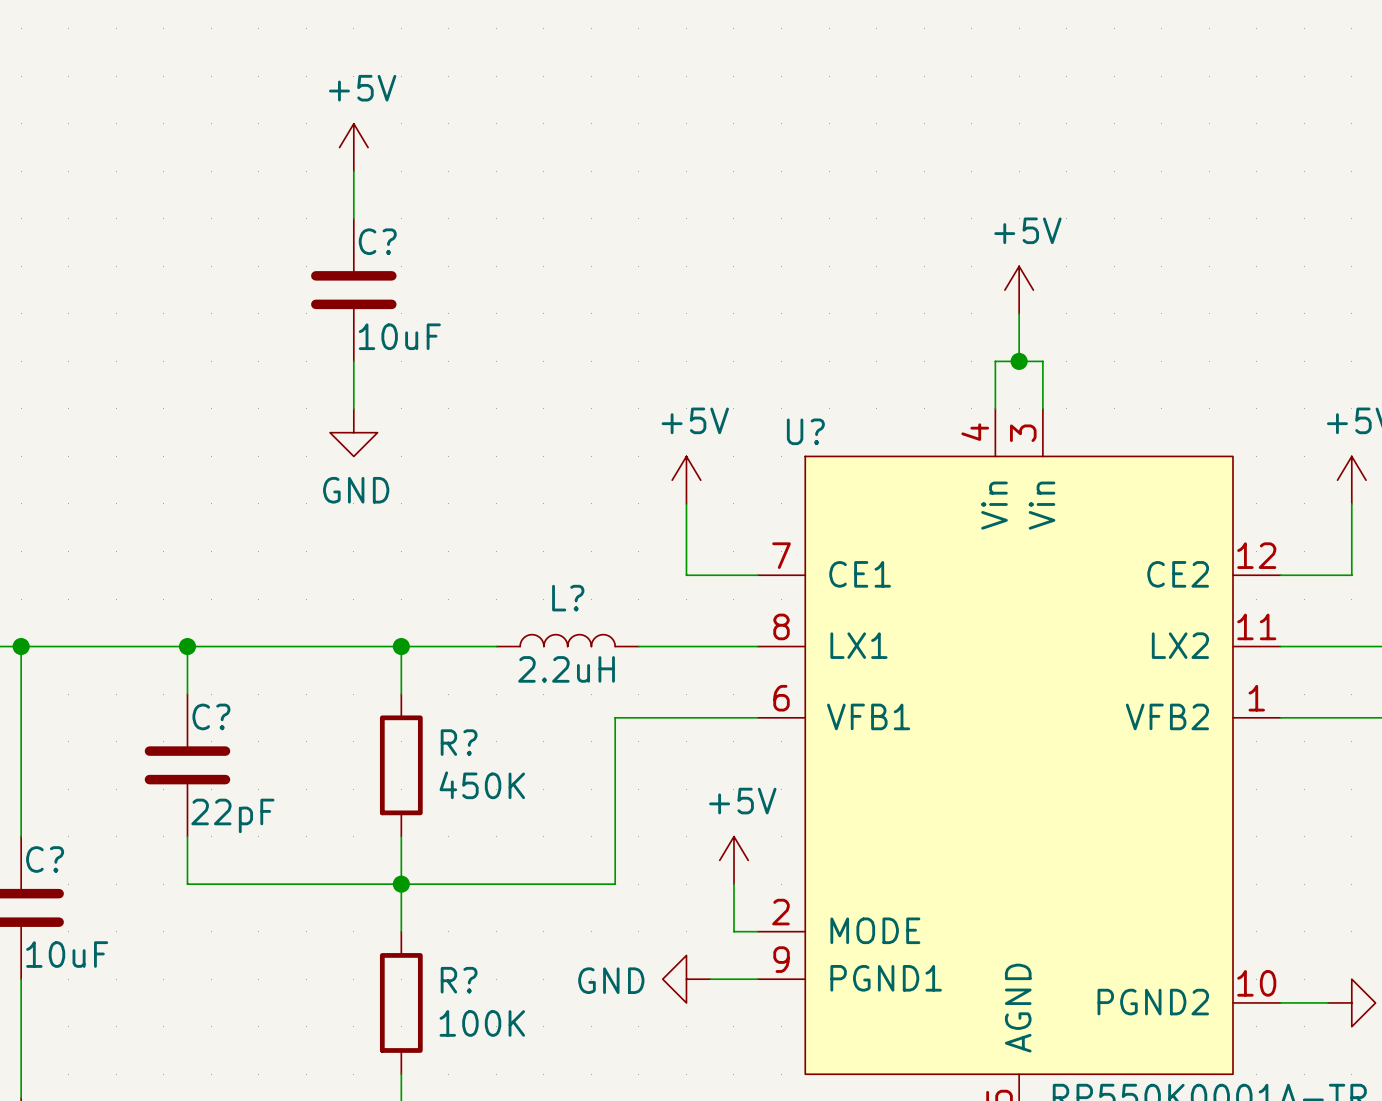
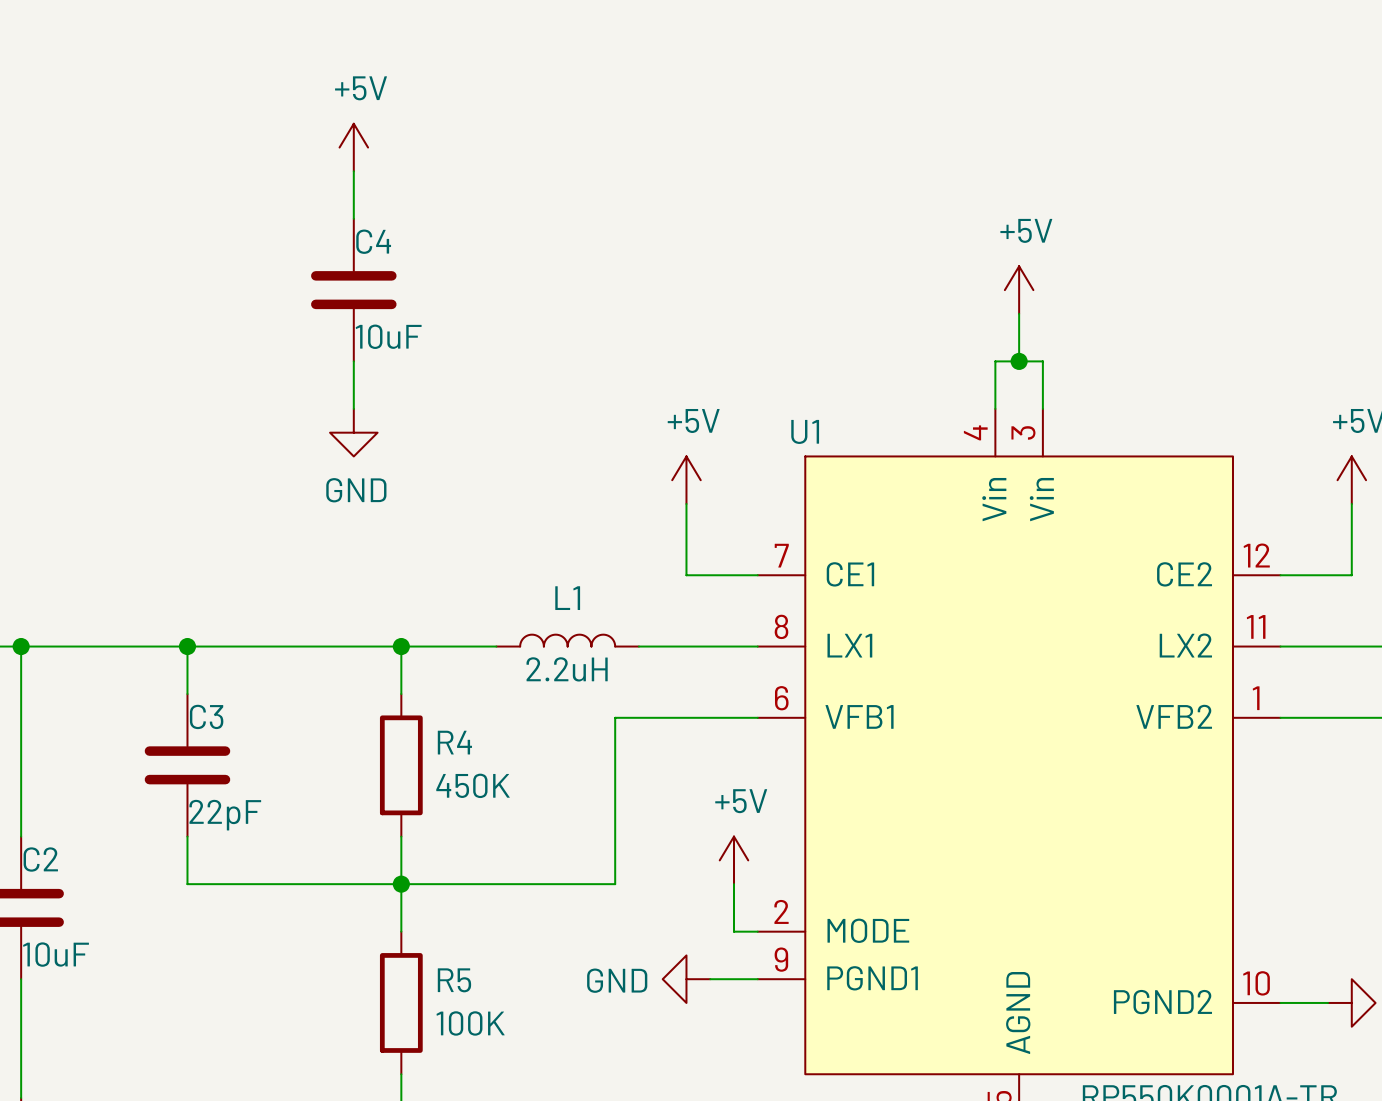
C? name: C? (377, 241) -> C4 (373, 241)
U? name: U? (805, 431) -> U1 (805, 431)
L? name: L? (568, 598) -> L1 (567, 598)
C? name: C? (211, 716) -> C3 (206, 716)
R? name: R? (459, 742) -> R4 (454, 742)
C? name: C? (45, 859) -> C2 (40, 859)
R? name: R? (459, 980) -> R5 (454, 980)

